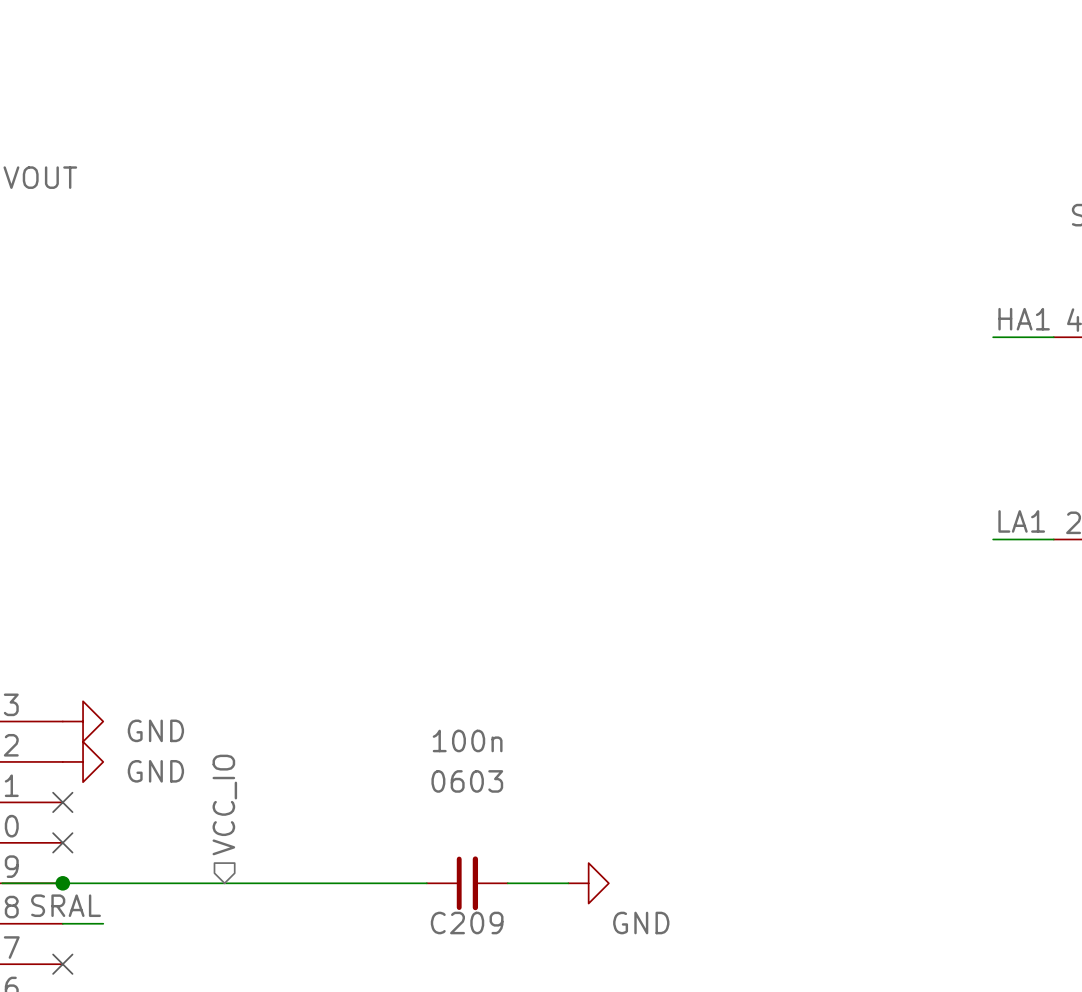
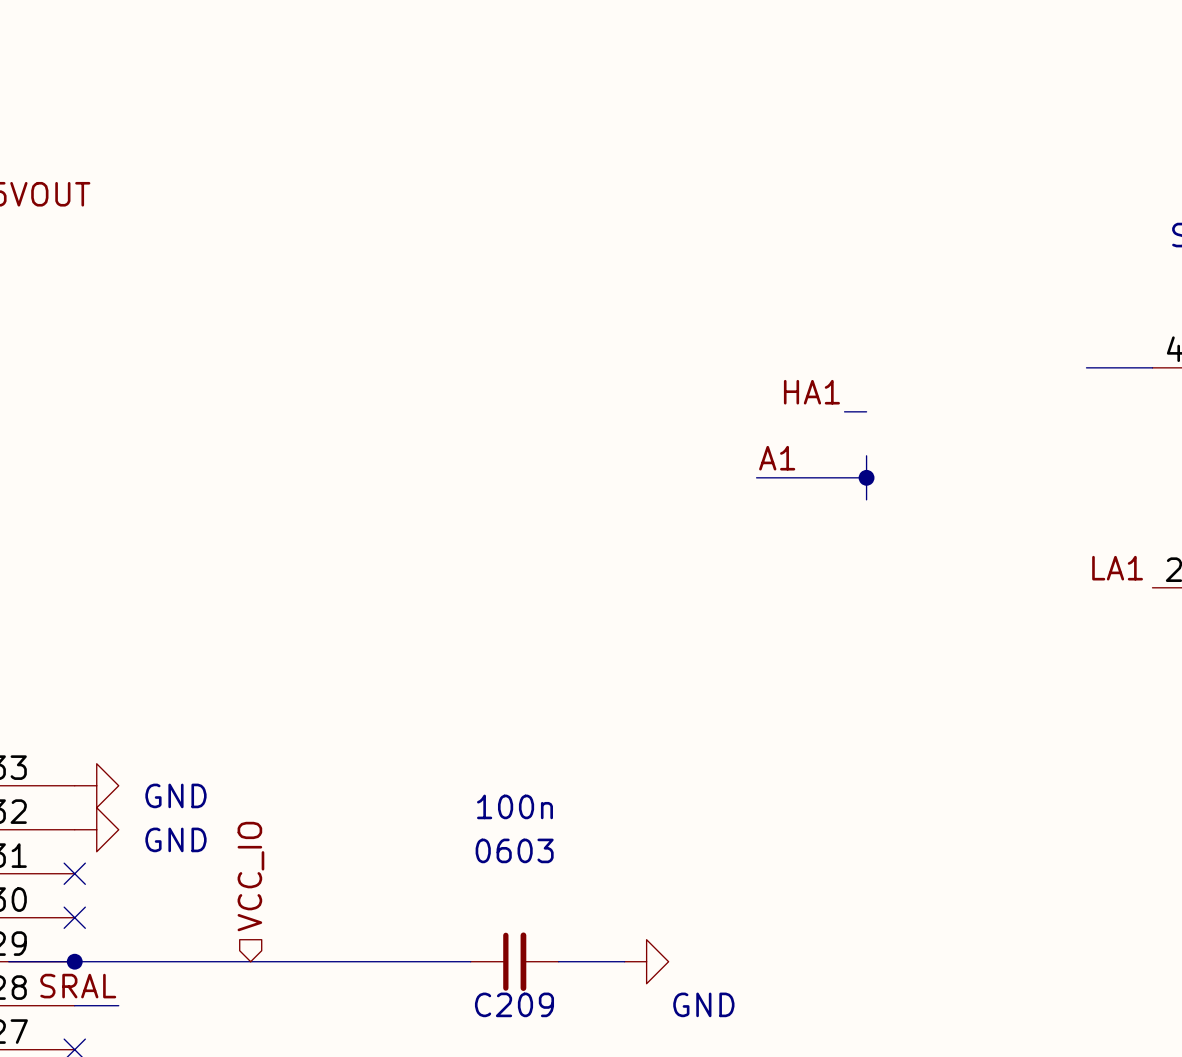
label position: HA1 (1024, 319) -> HA1 (811, 392)
wire: none -> (844, 411) (866, 411)
wire: none -> (866, 455) (866, 499)
label: none -> A1 (777, 458)
wire: none -> (756, 477) (866, 477)
junction: none -> (866, 477)
wire: (993, 539) (1053, 539) -> none

